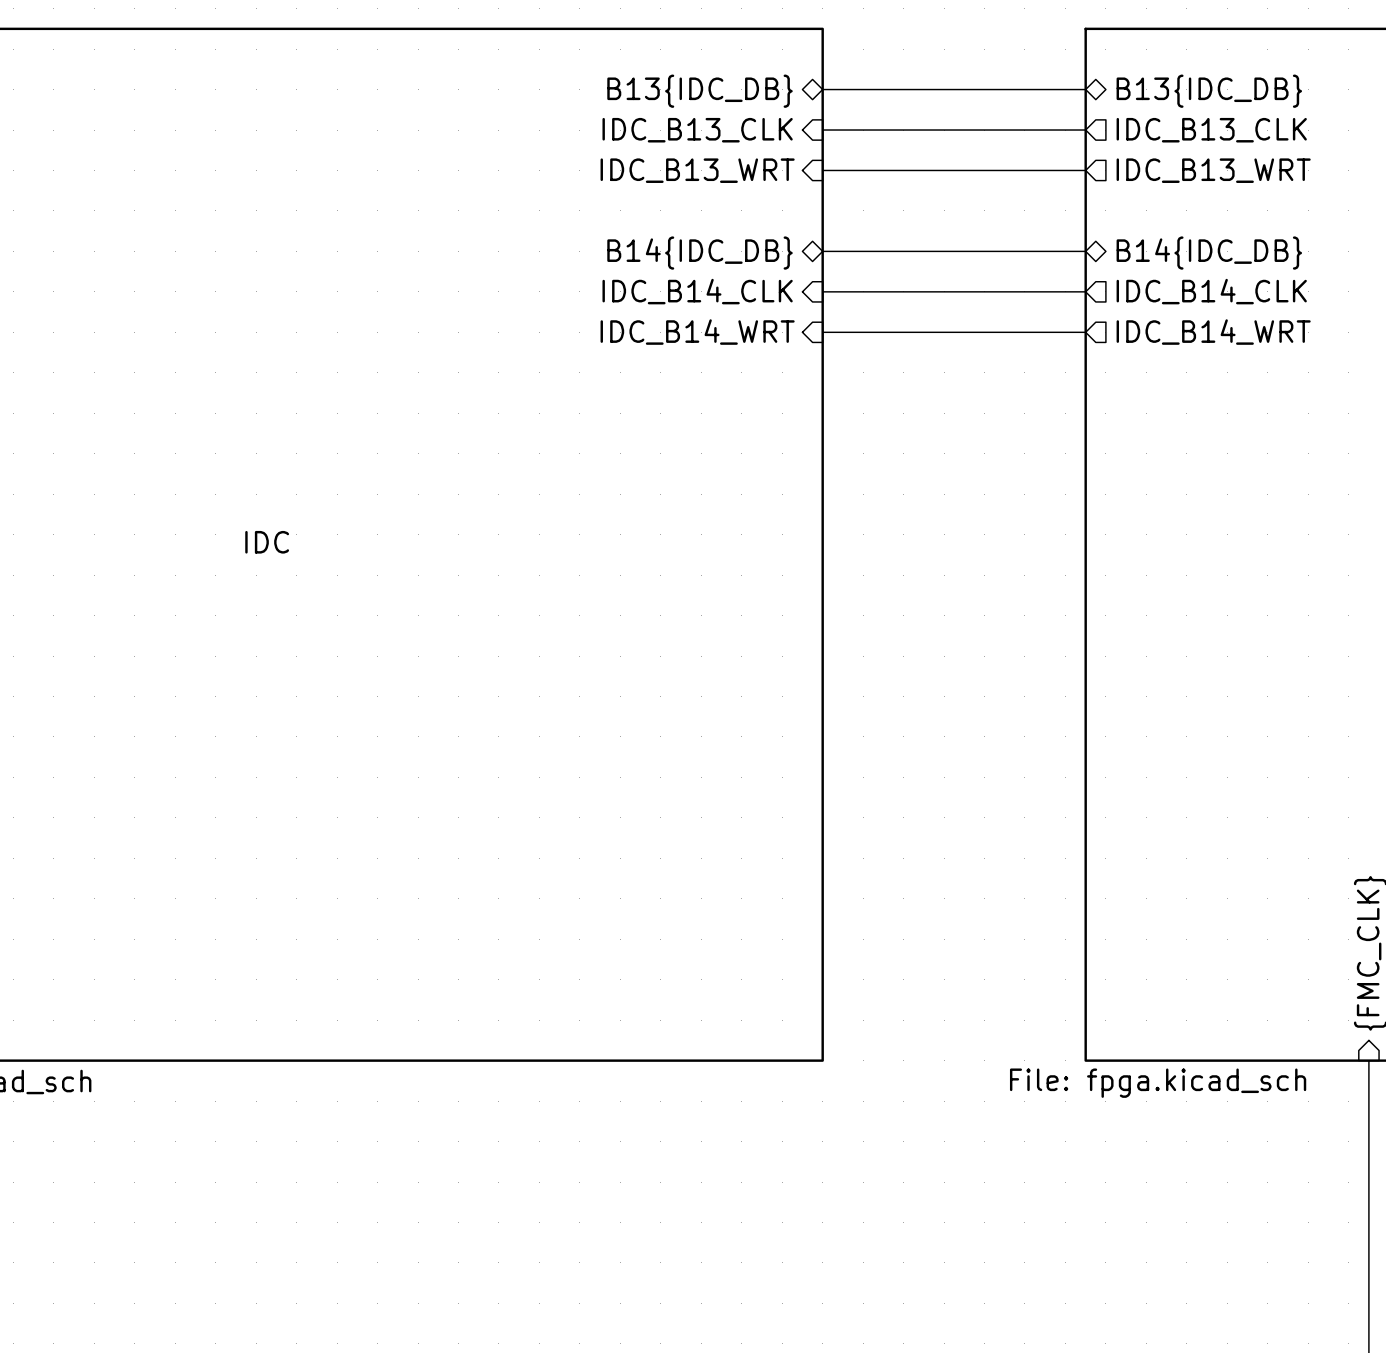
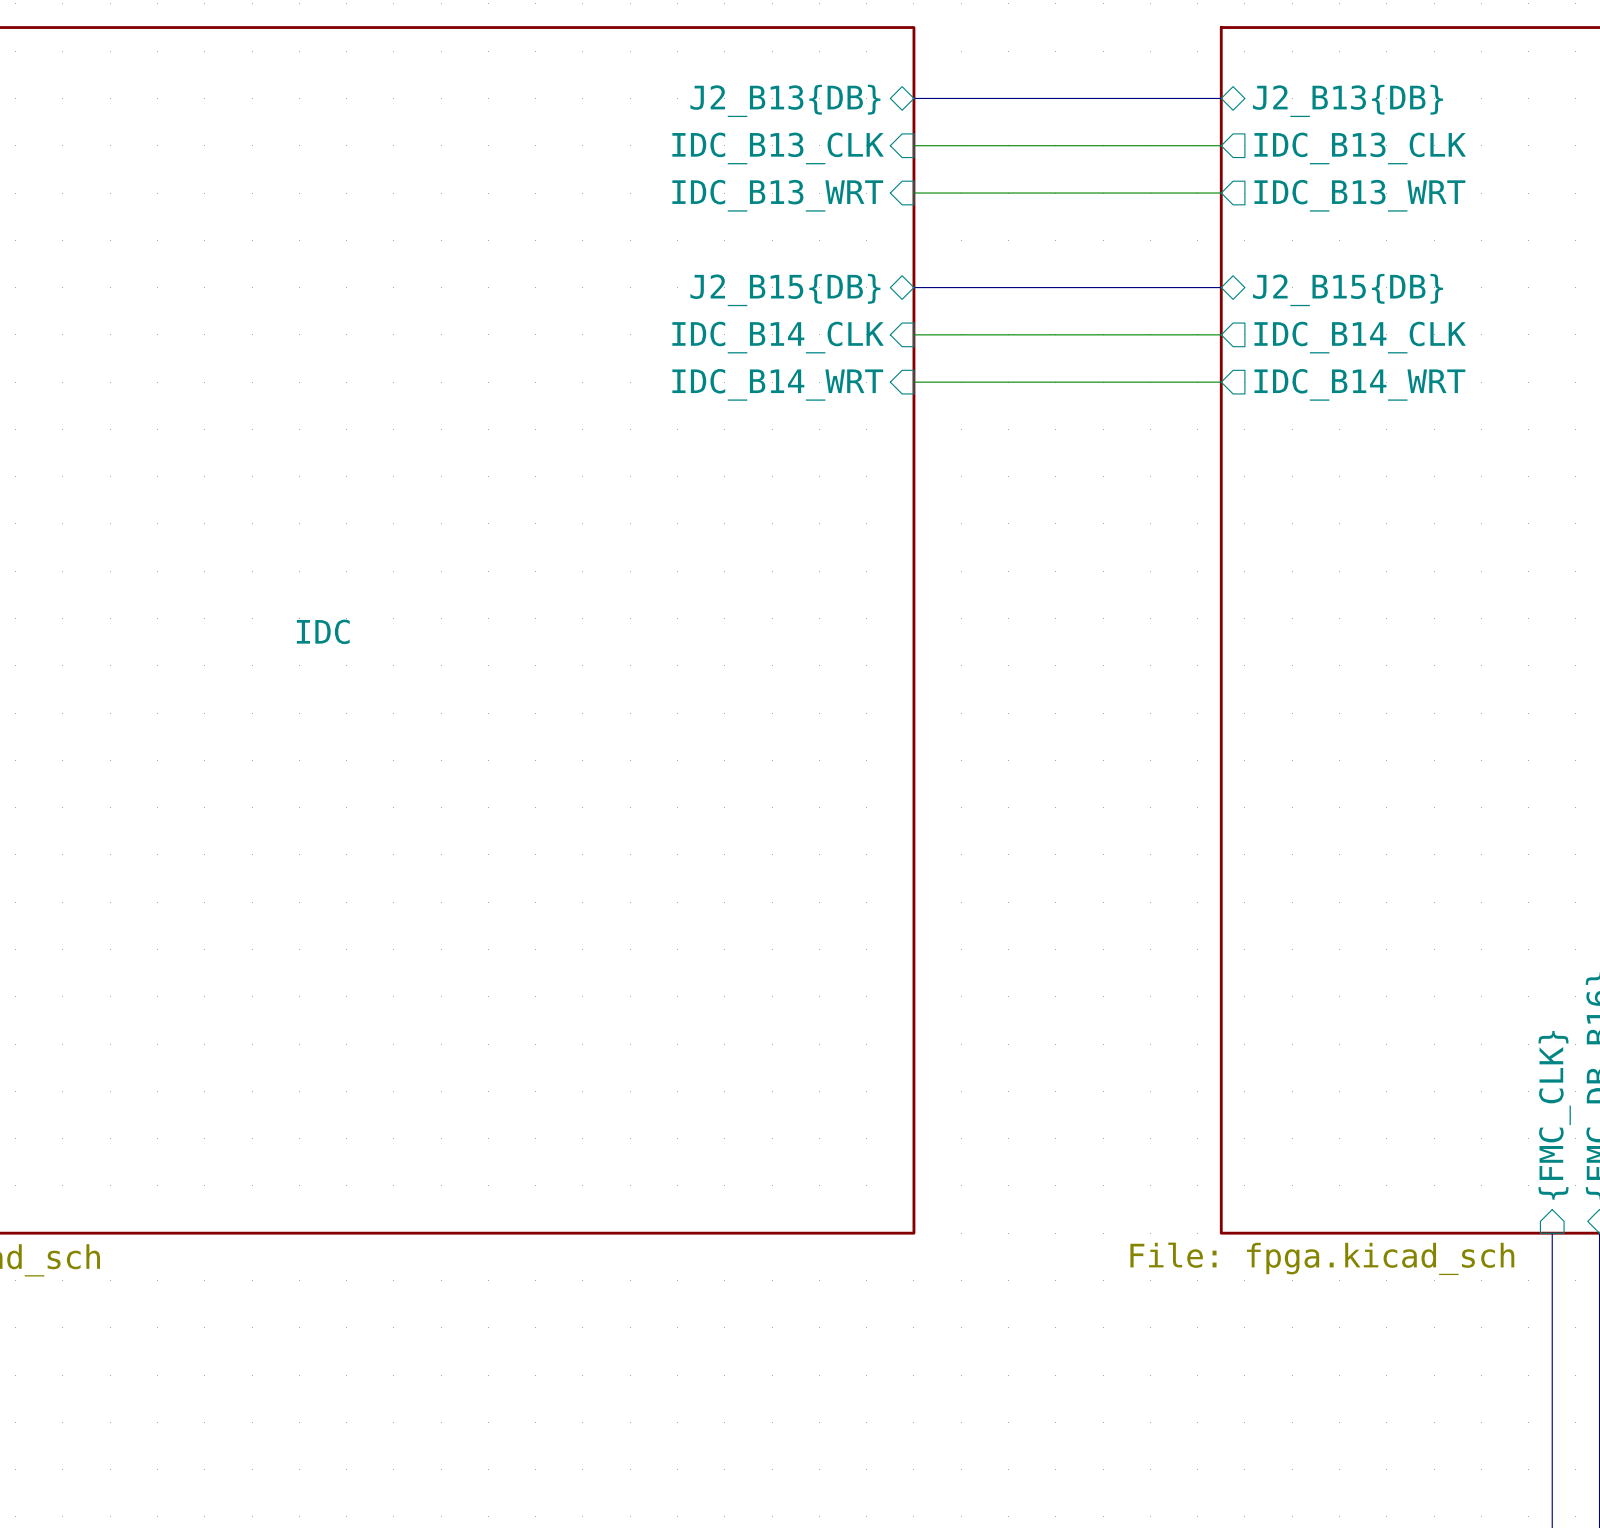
sheet pin: B13{IDC_DB} (700, 91) -> J2_B13{DB} (785, 100)
sheet pin: B13{IDC_DB} (1209, 91) -> J2_B13{DB} (1348, 100)
sheet pin: B14{IDC_DB} (700, 253) -> J2_B15{DB} (785, 290)
sheet pin: B14{IDC_DB} (1209, 253) -> J2_B15{DB} (1348, 290)
sheet IDC name position: IDC (267, 542) -> IDC (323, 631)

